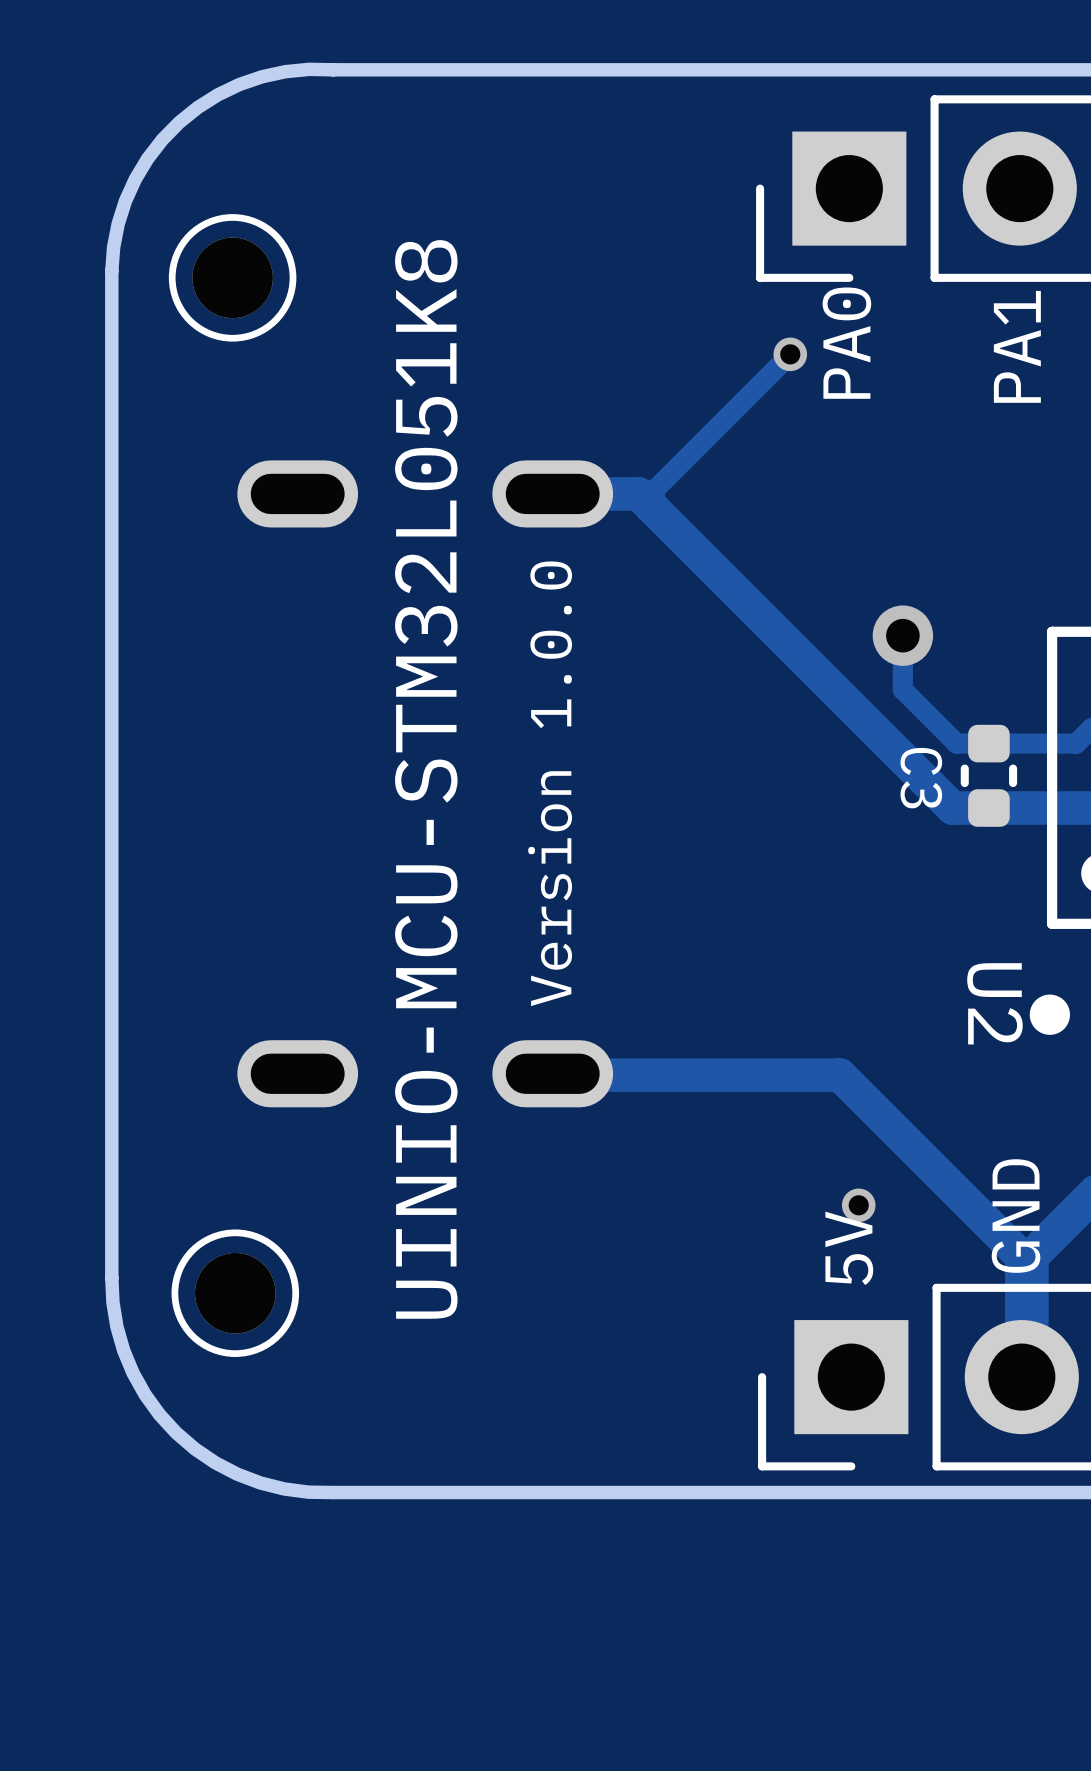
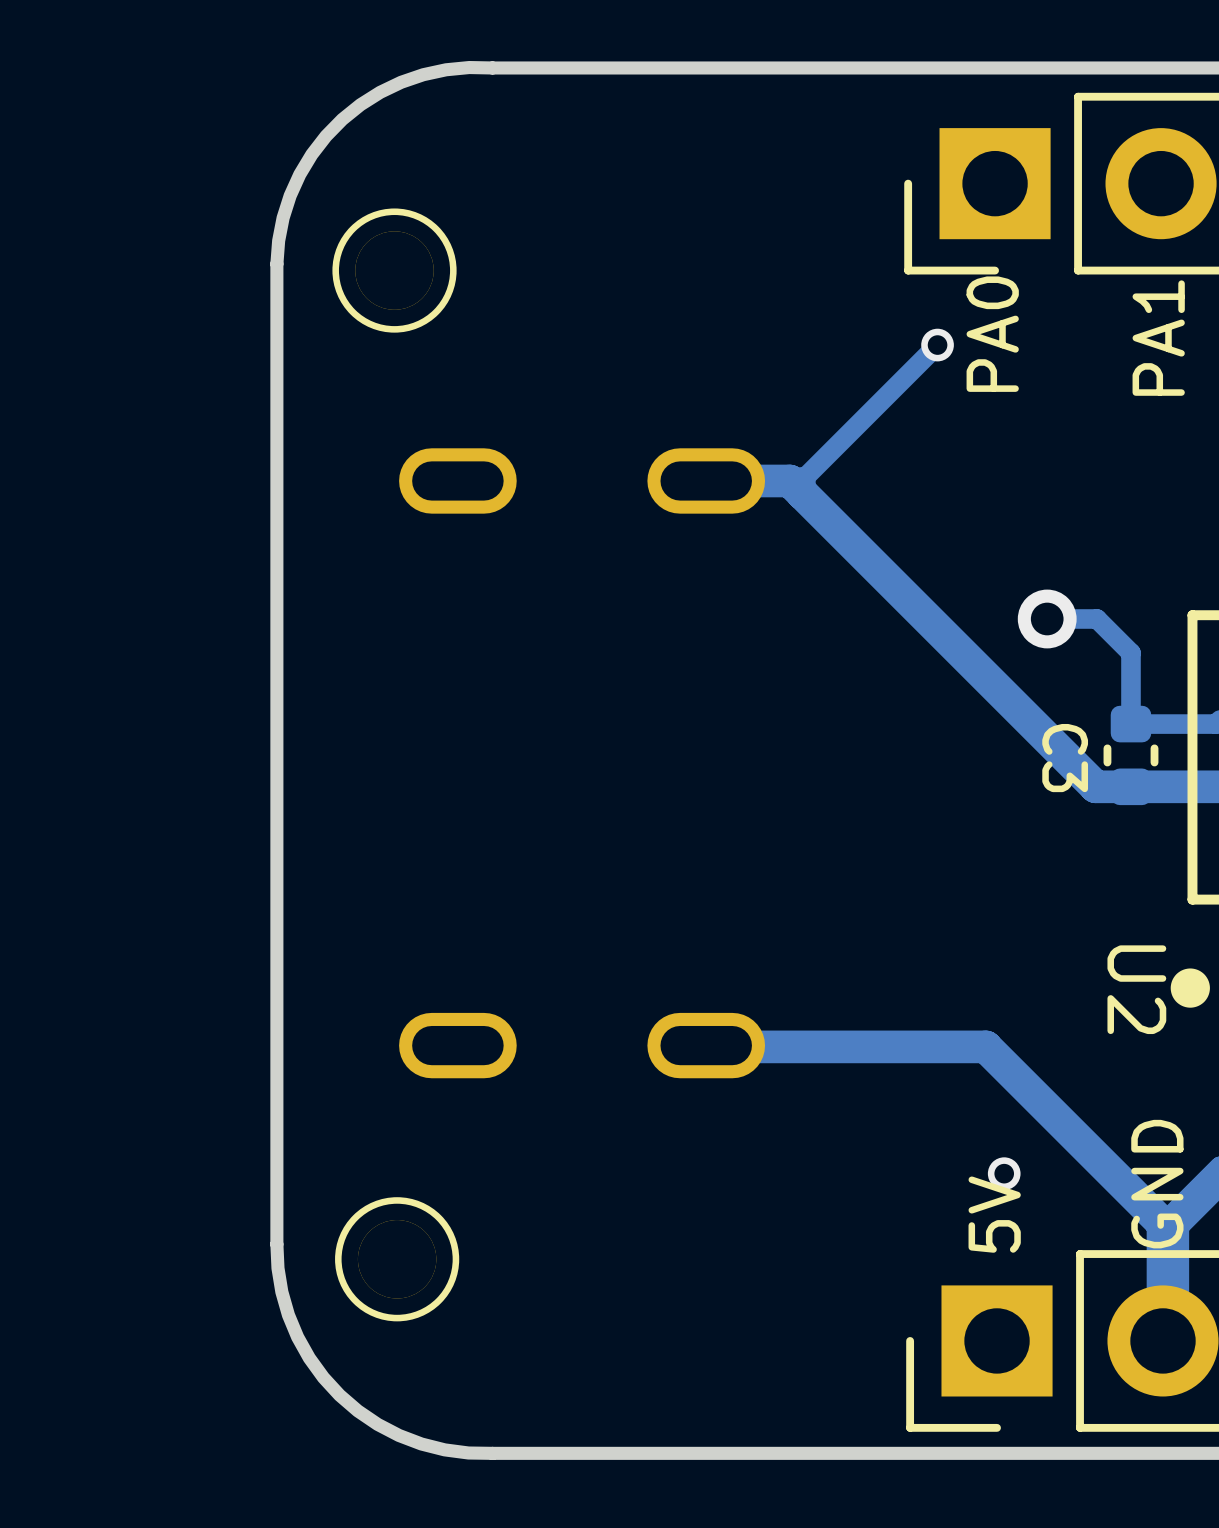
track: (902, 635) (902, 689) (956, 743) (988, 743) -> (1047, 618) (1097, 618) (1130, 652) (1130, 724)
text: UINIO-MCU-STM32L051K8 (426, 779) -> none
text: Version 1.0.0 (550, 783) -> none

